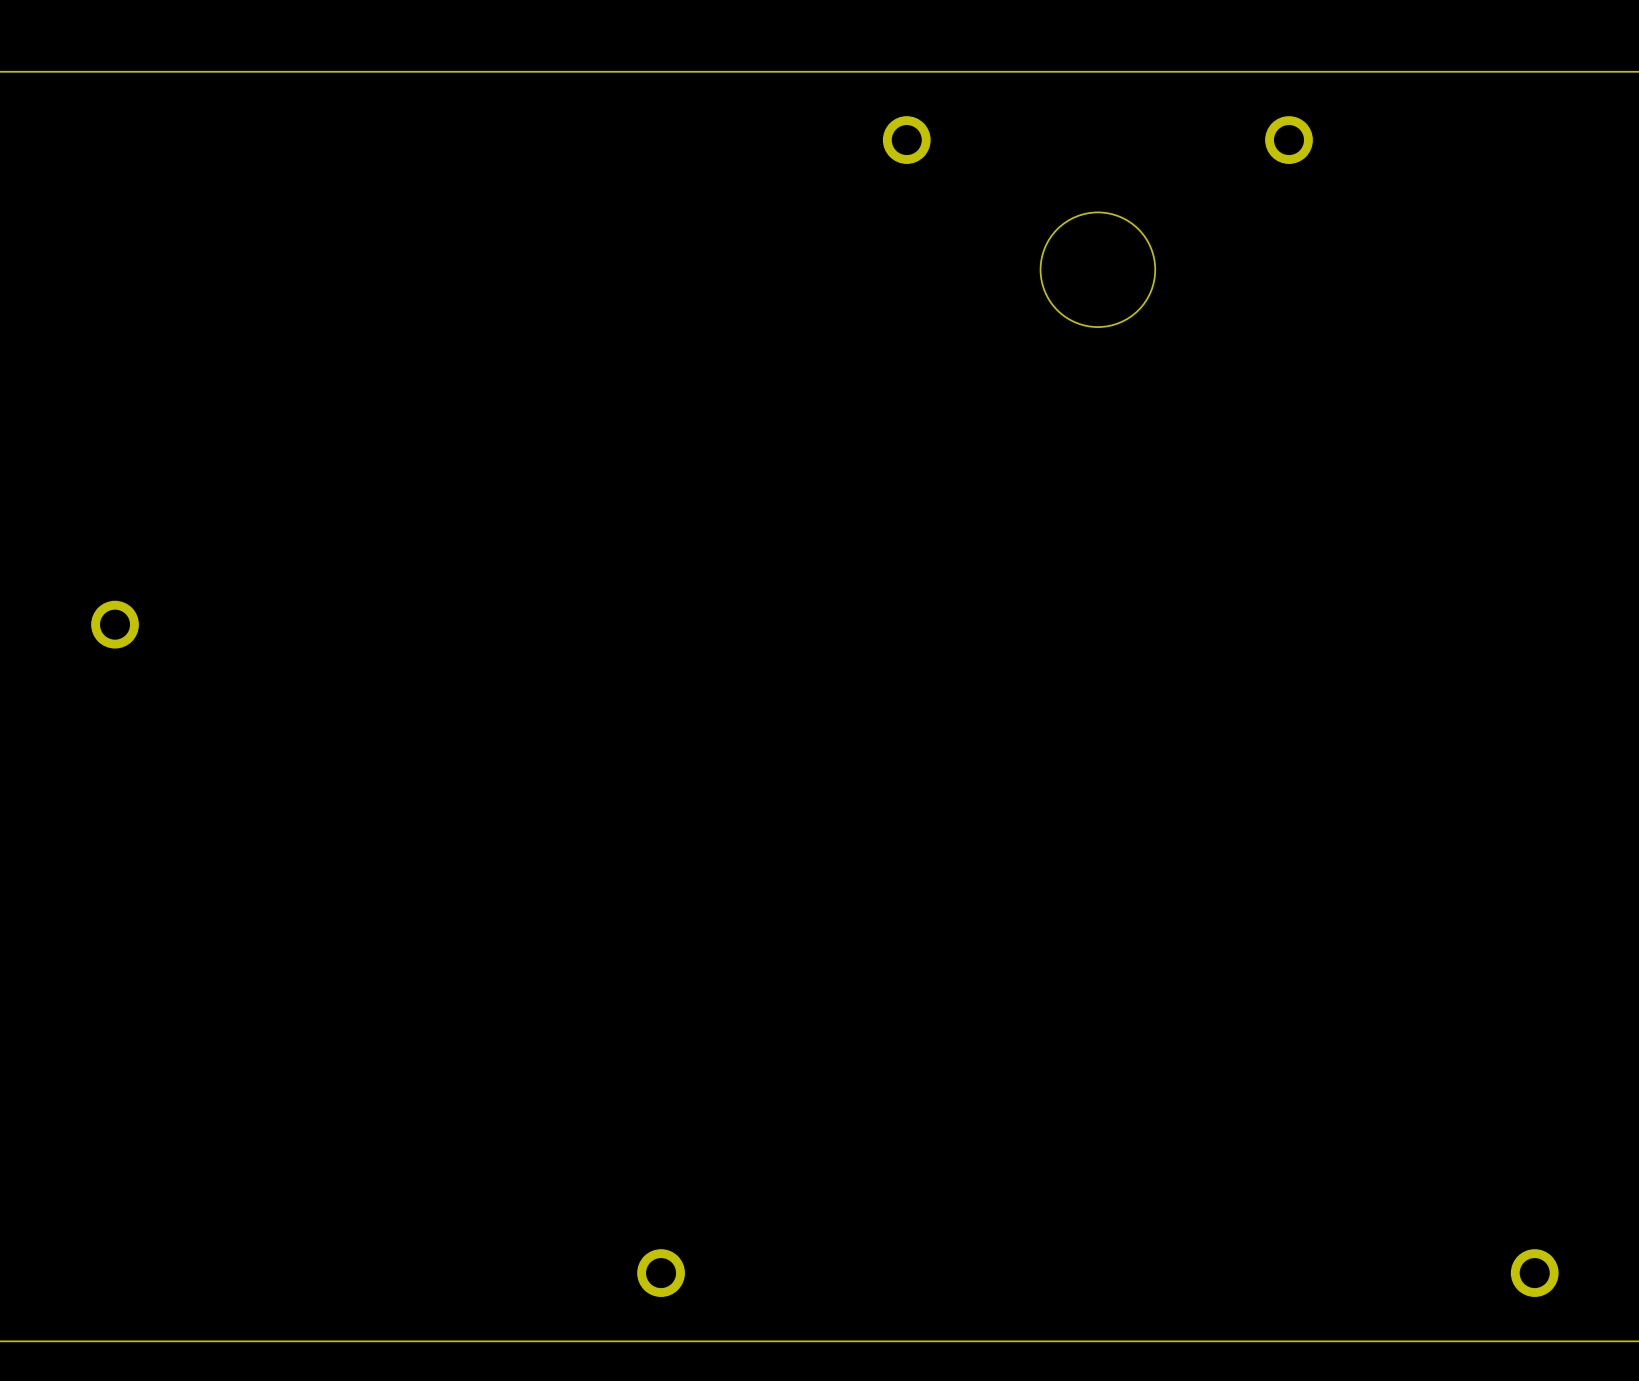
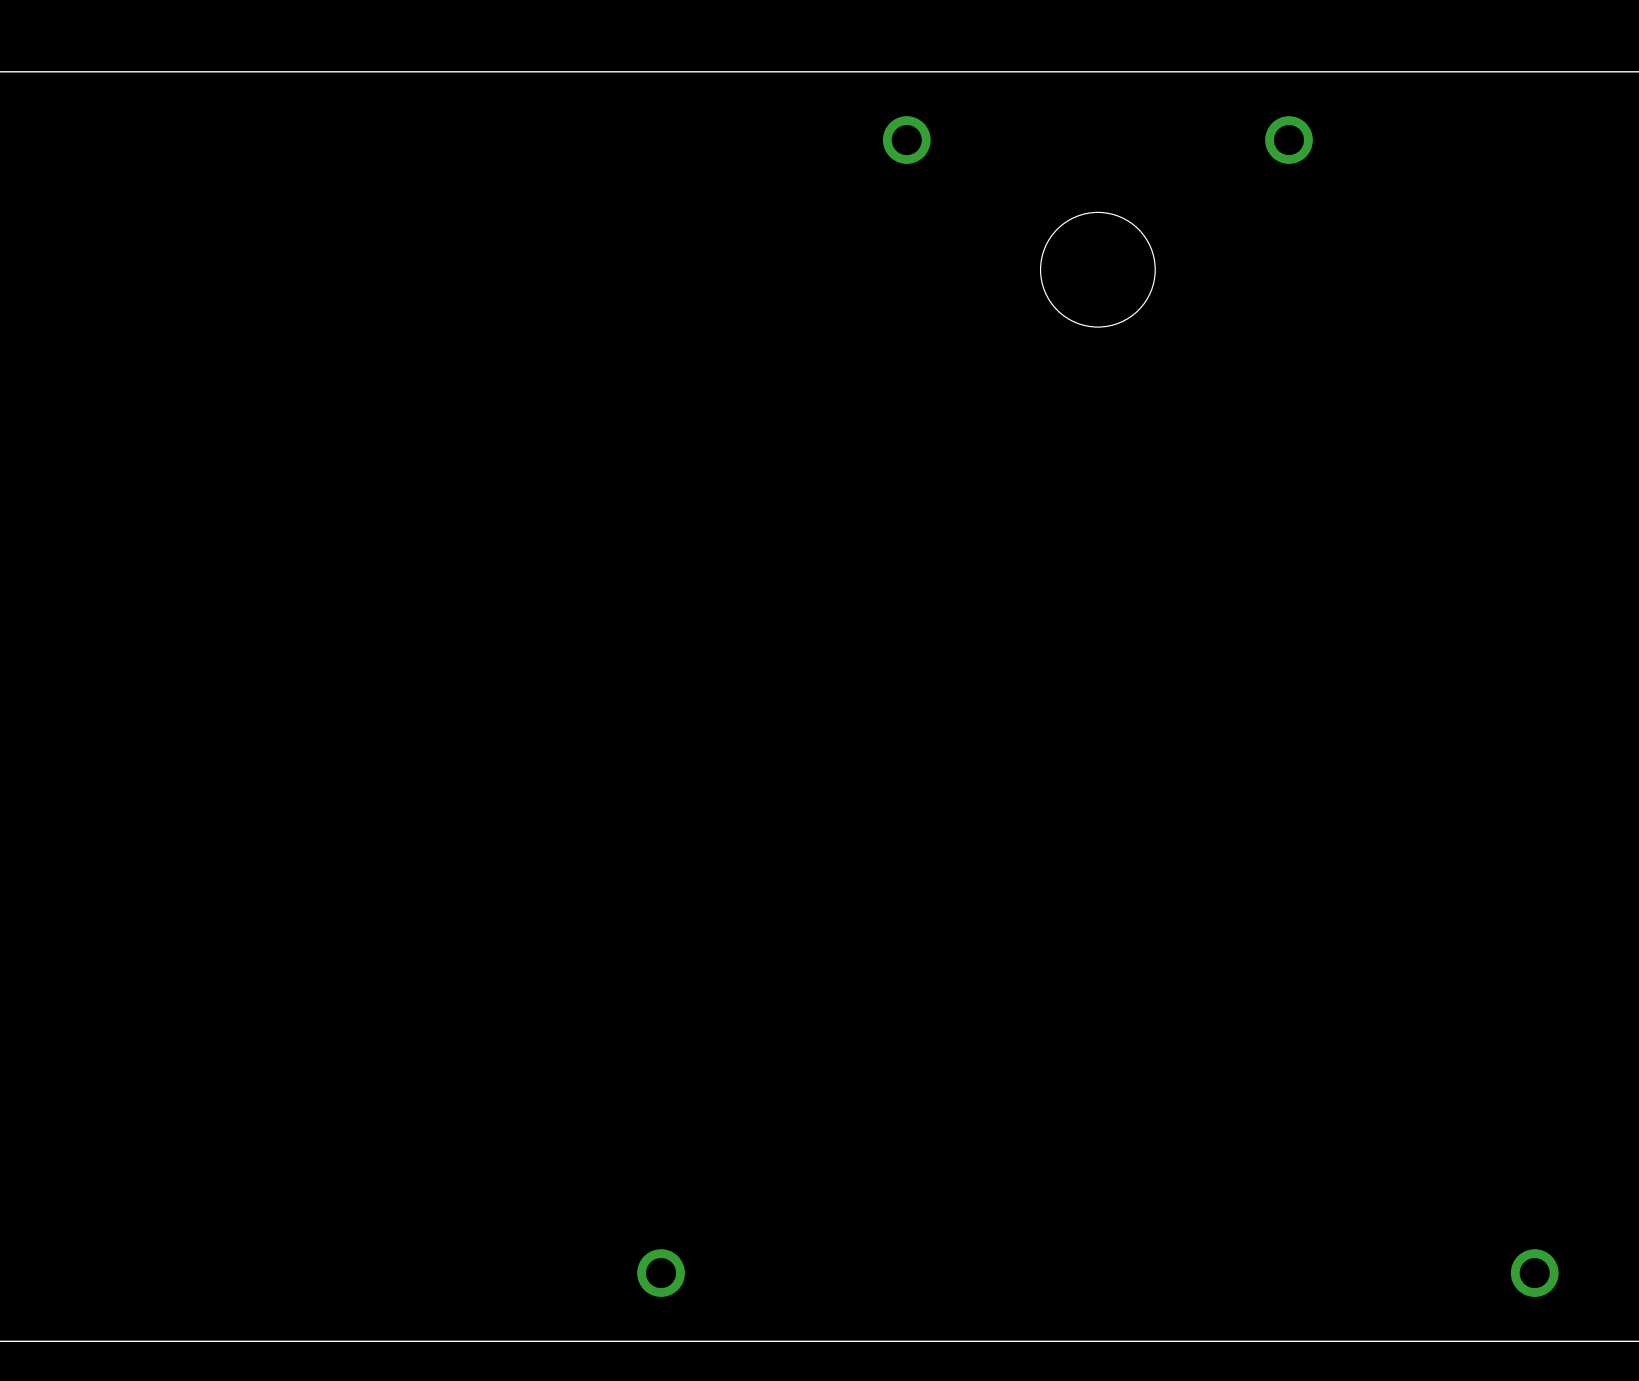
part: (115, 624) -> none

